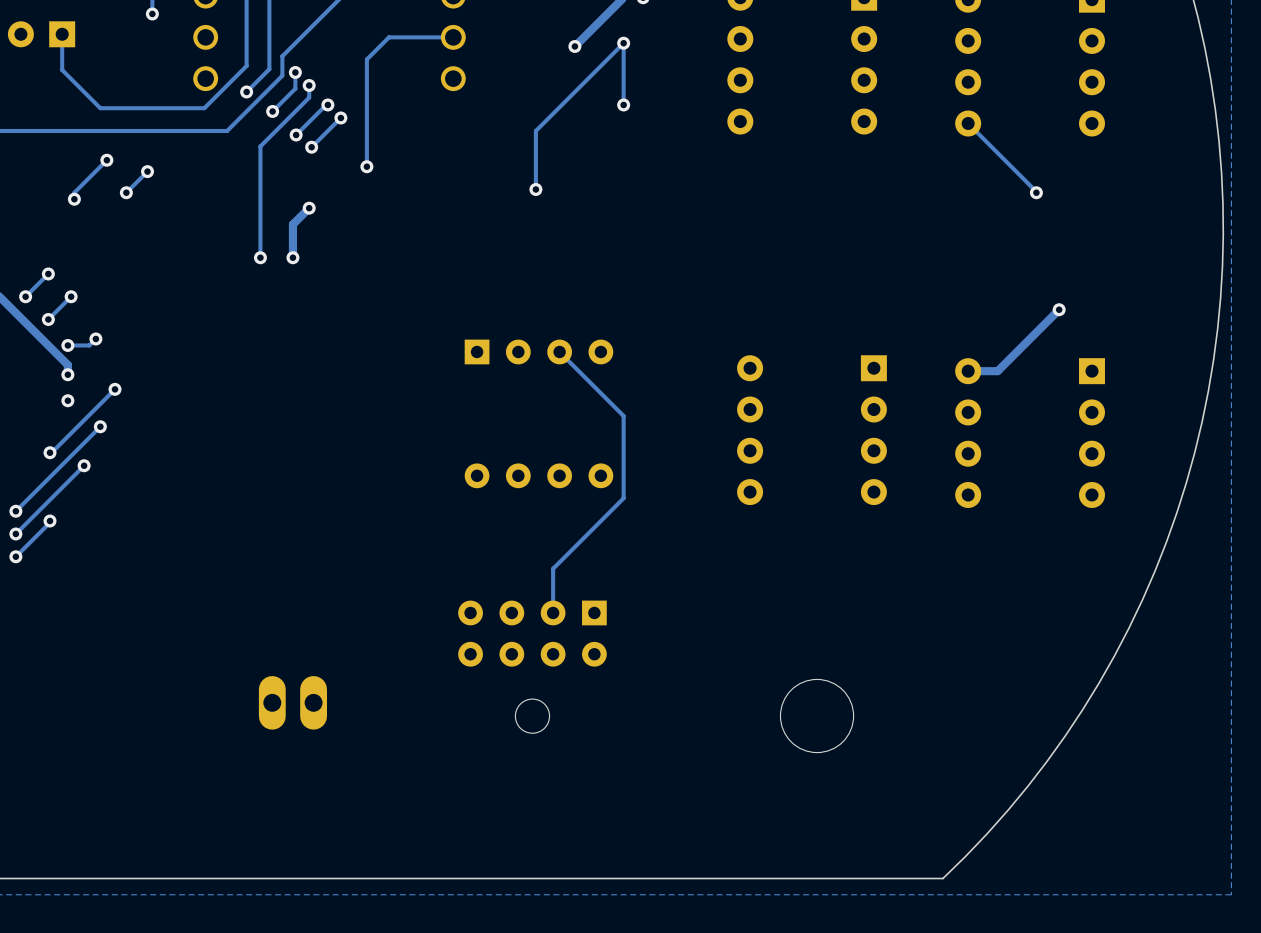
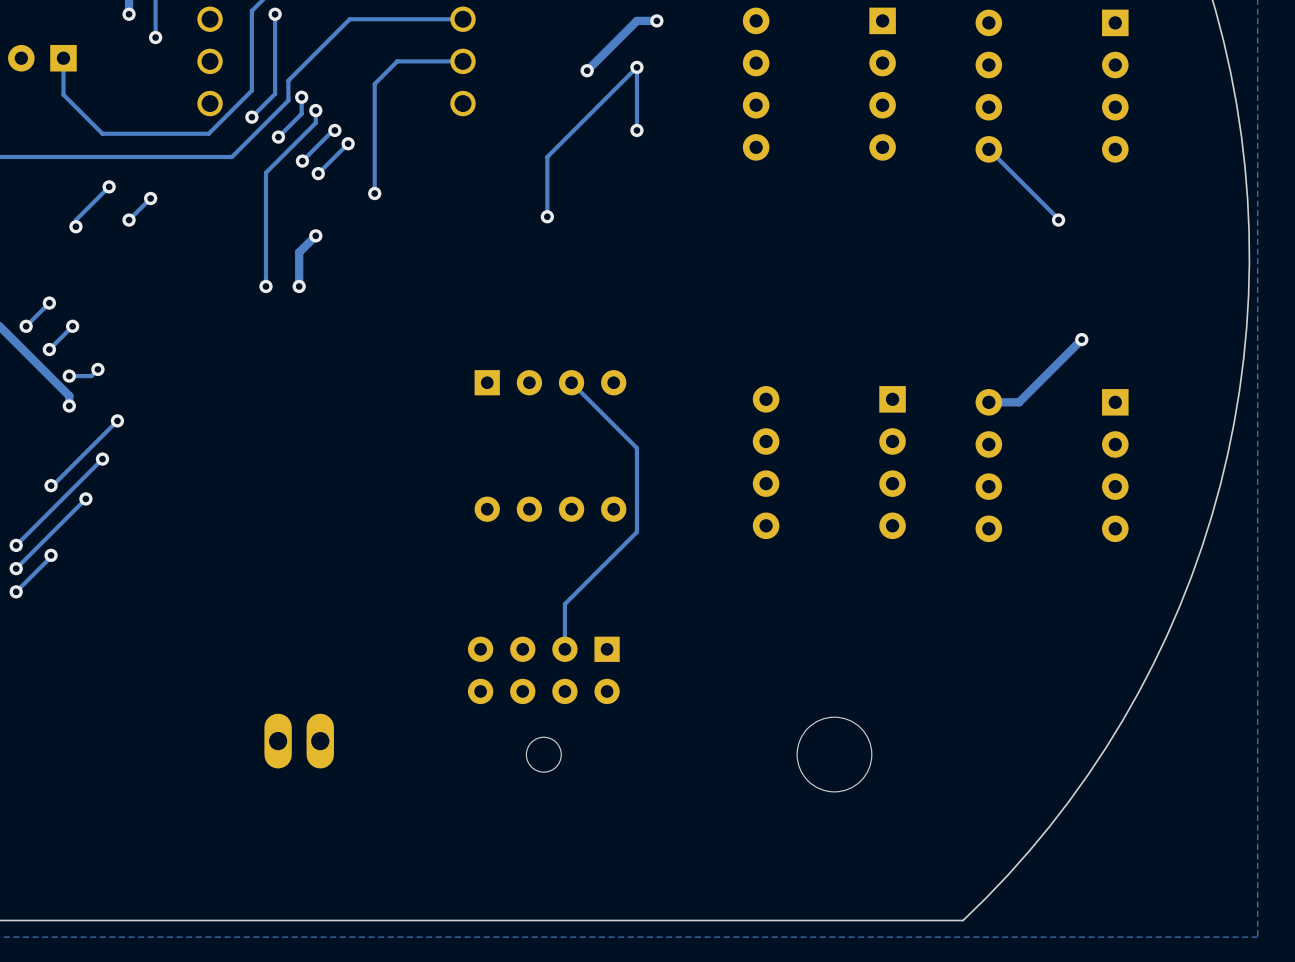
via: (67, 400) -> none

